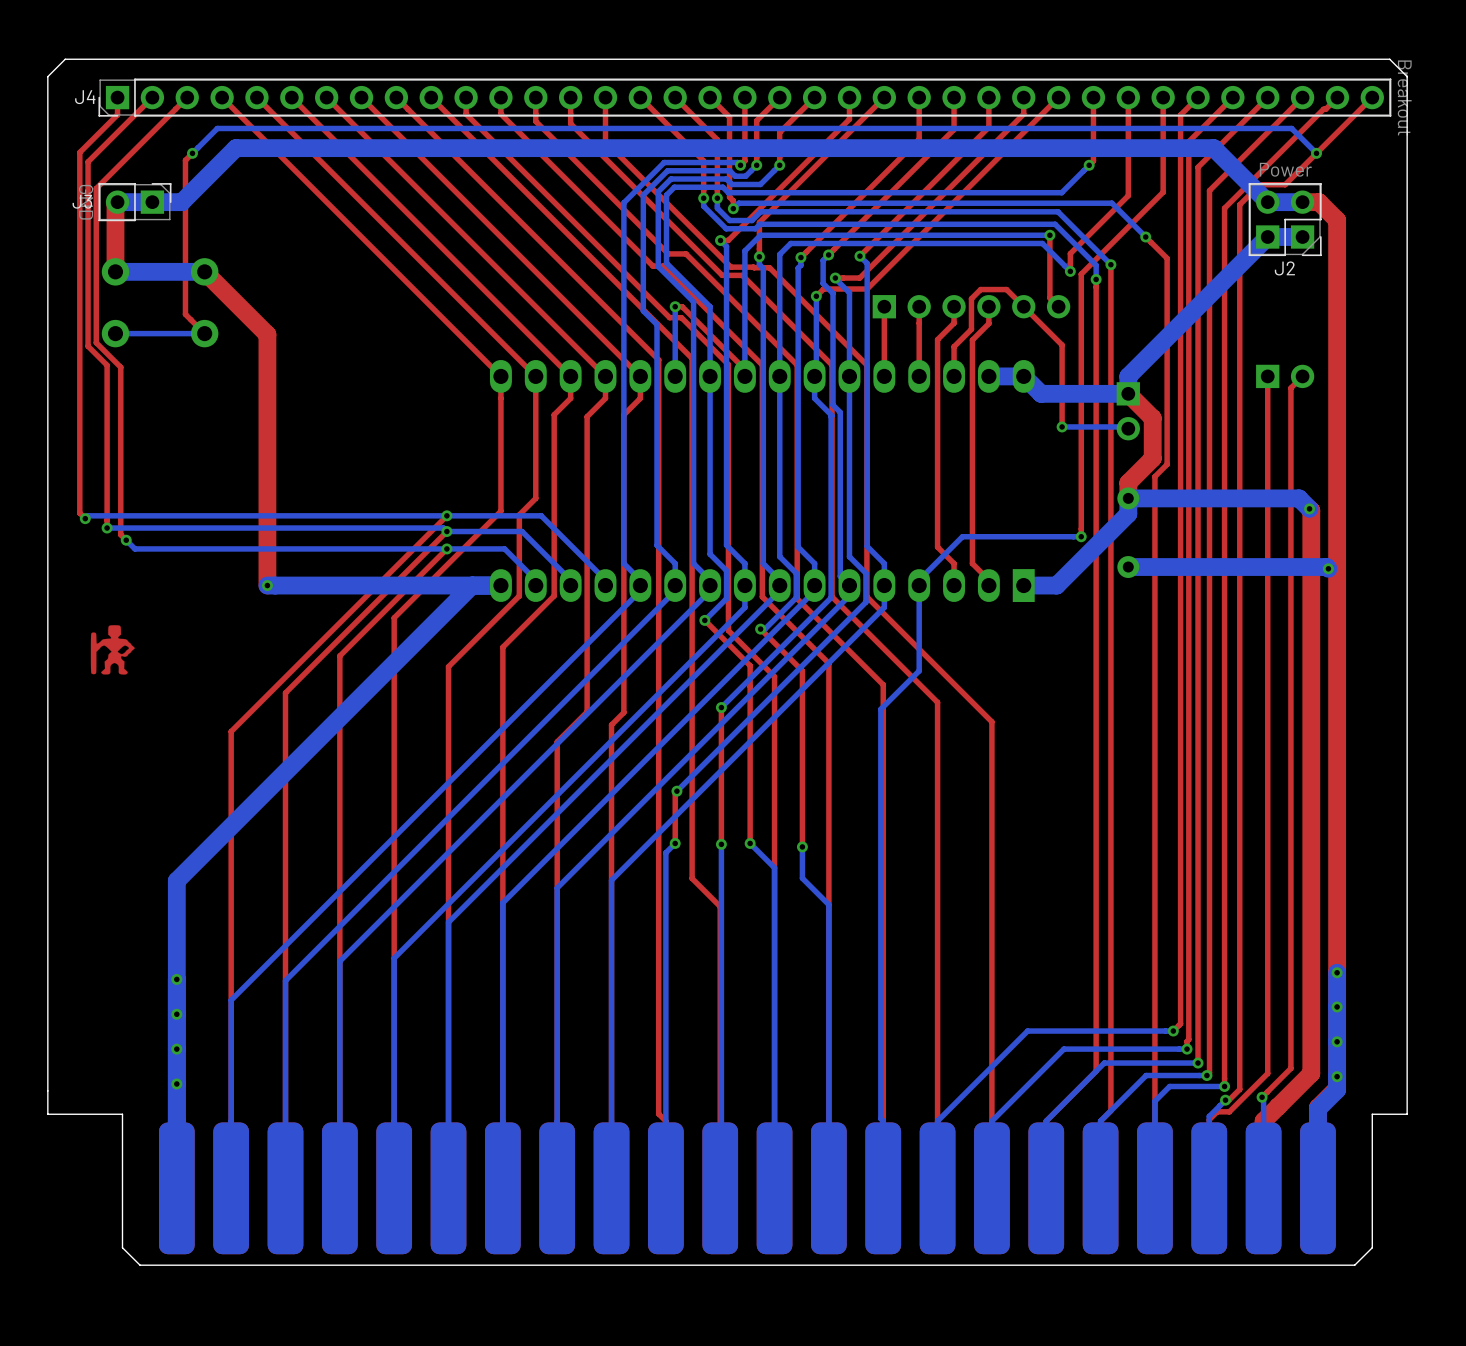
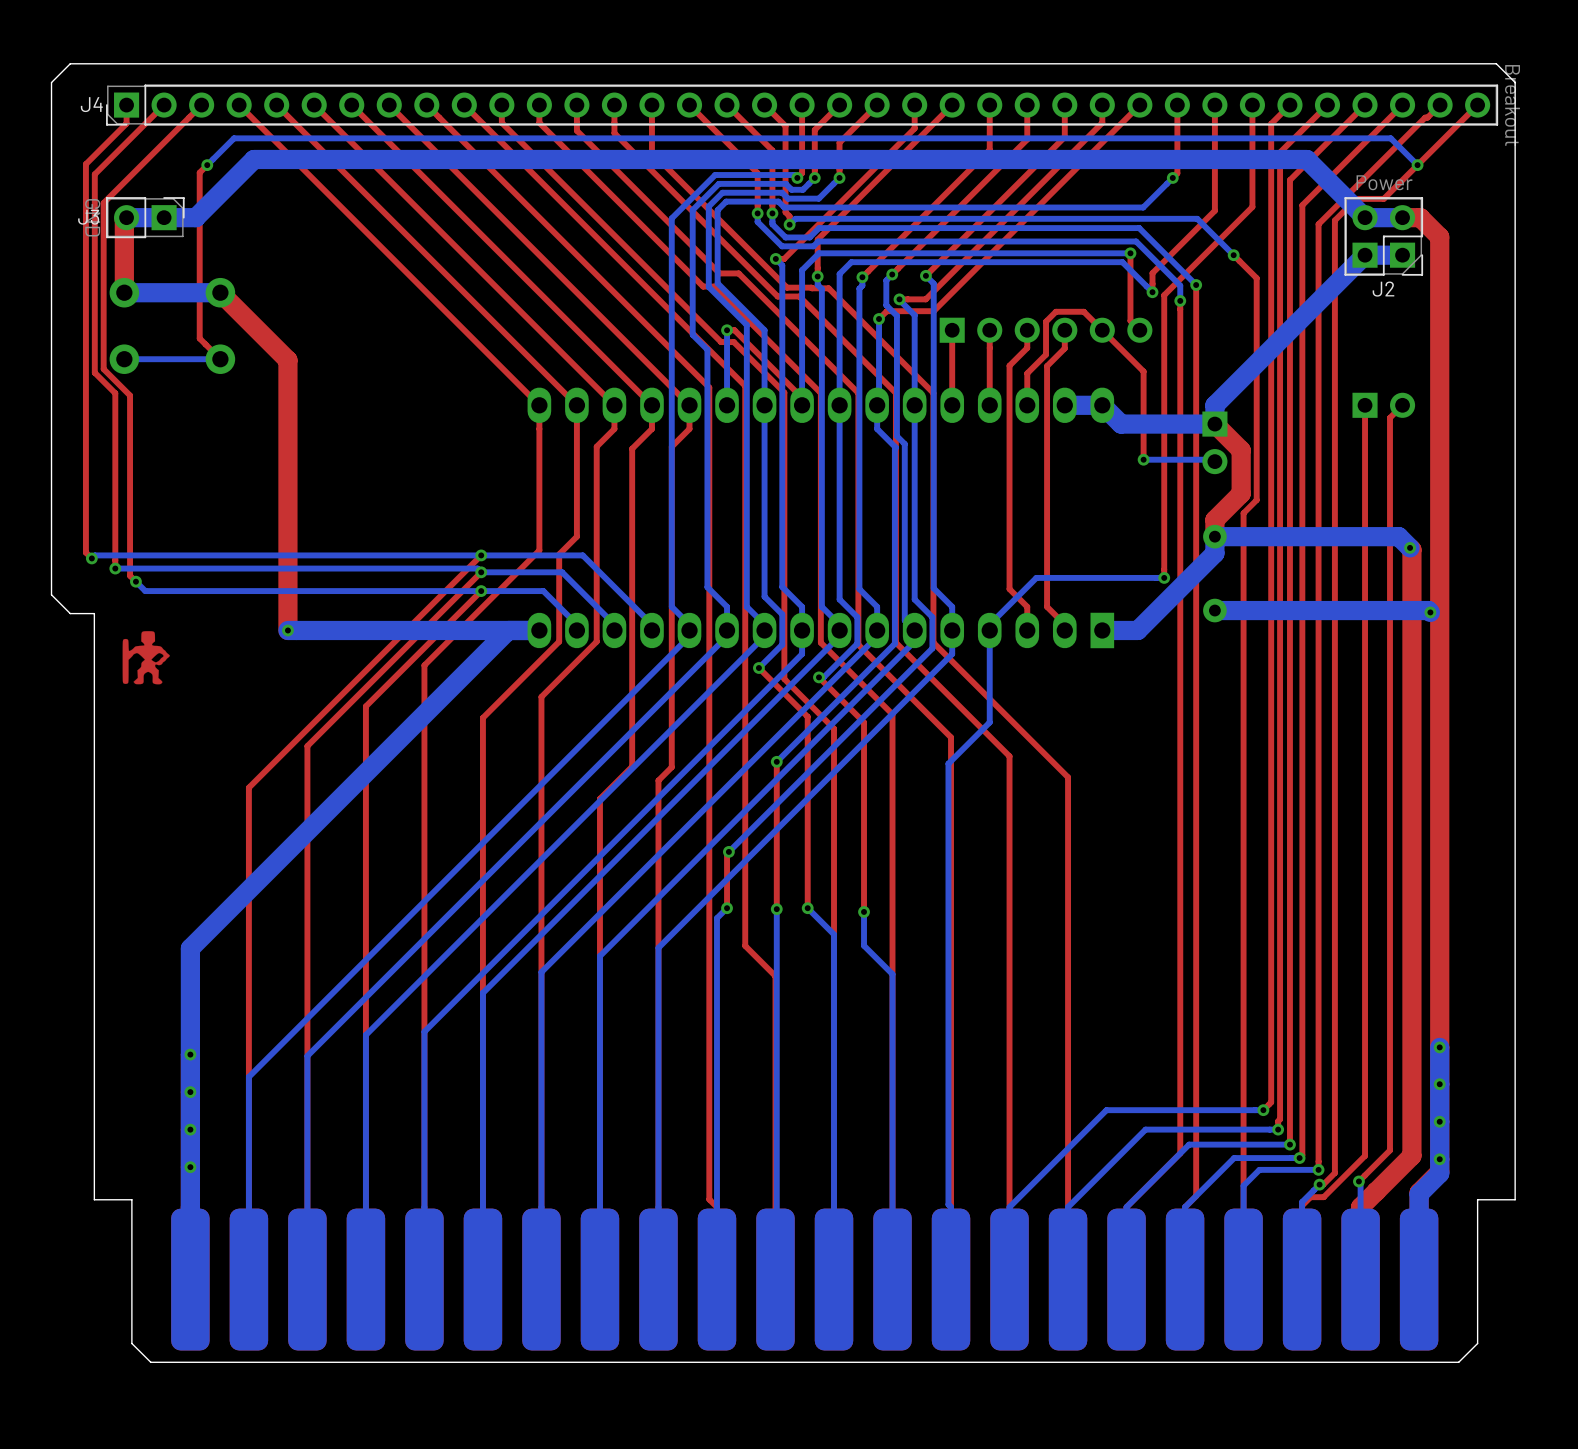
board edge: (47, 552) (47, 1114) (87, 1114) -> (51, 594) (70, 613) (94, 613) (94, 1199)
drawing position: (112, 649) -> (146, 657)

